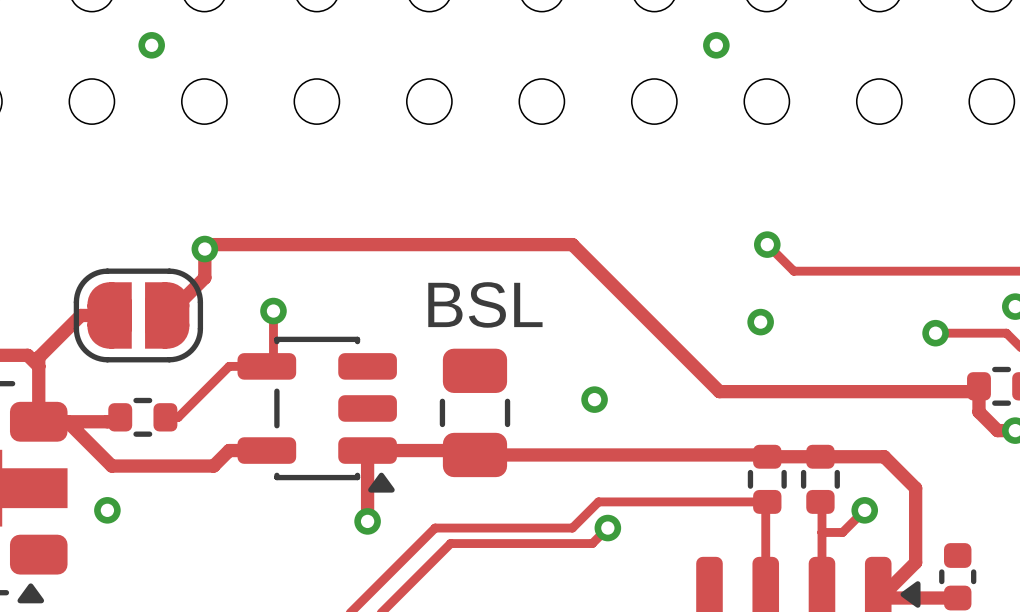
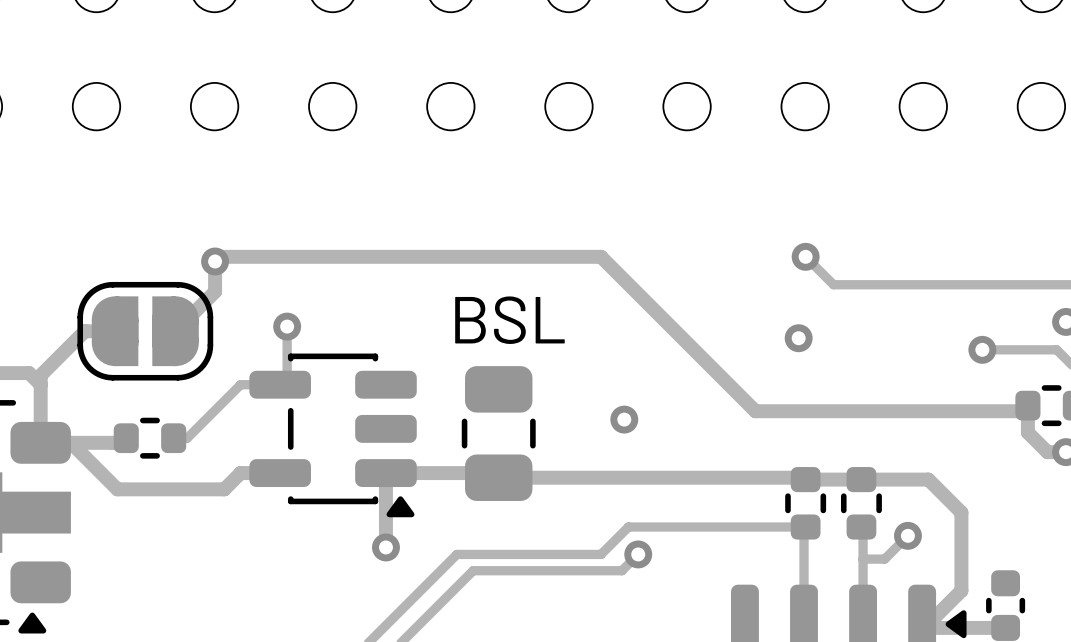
via: (151, 45) -> none
via: (716, 45) -> none
via: (107, 510) -> none

